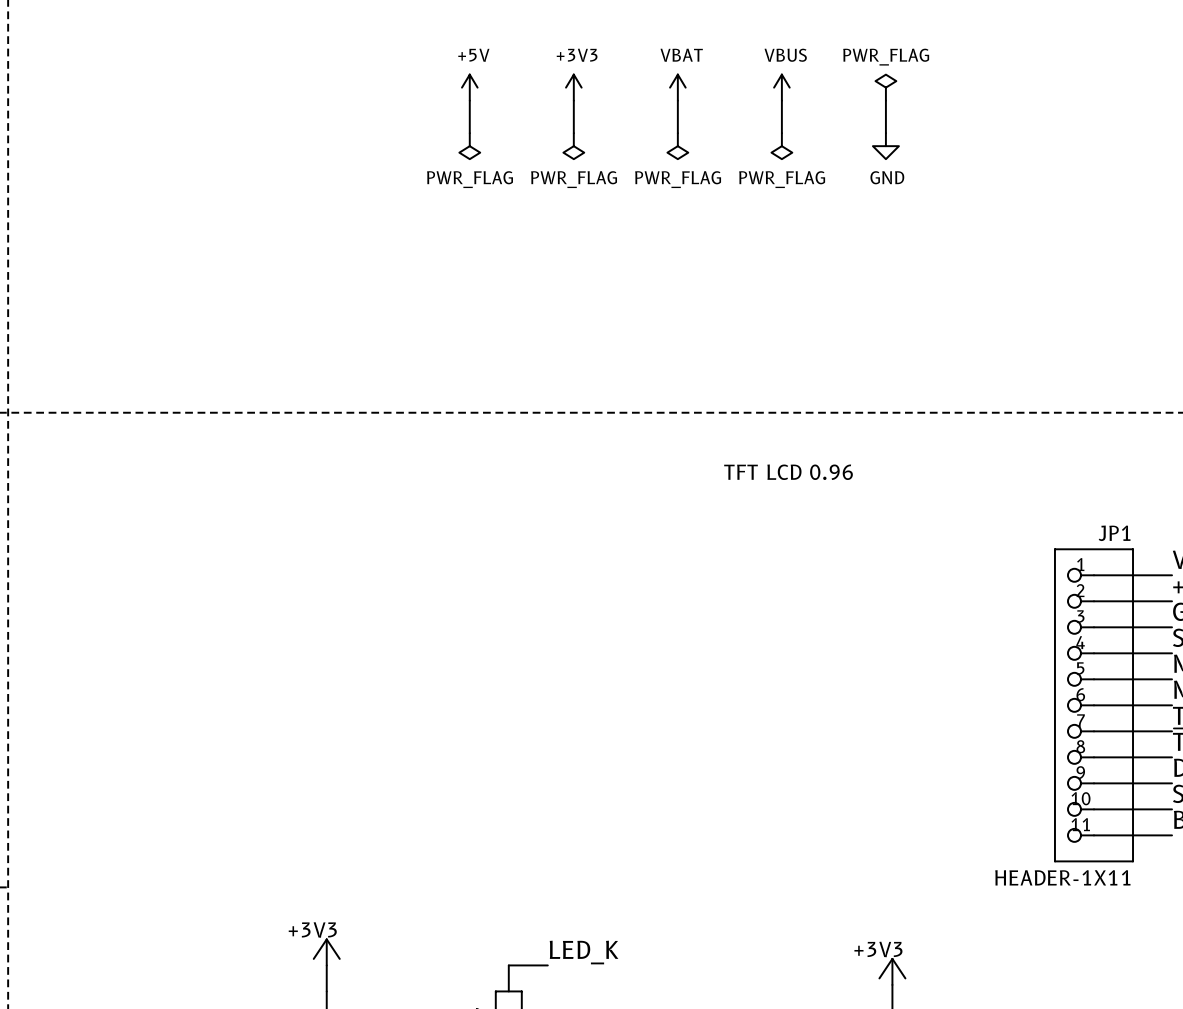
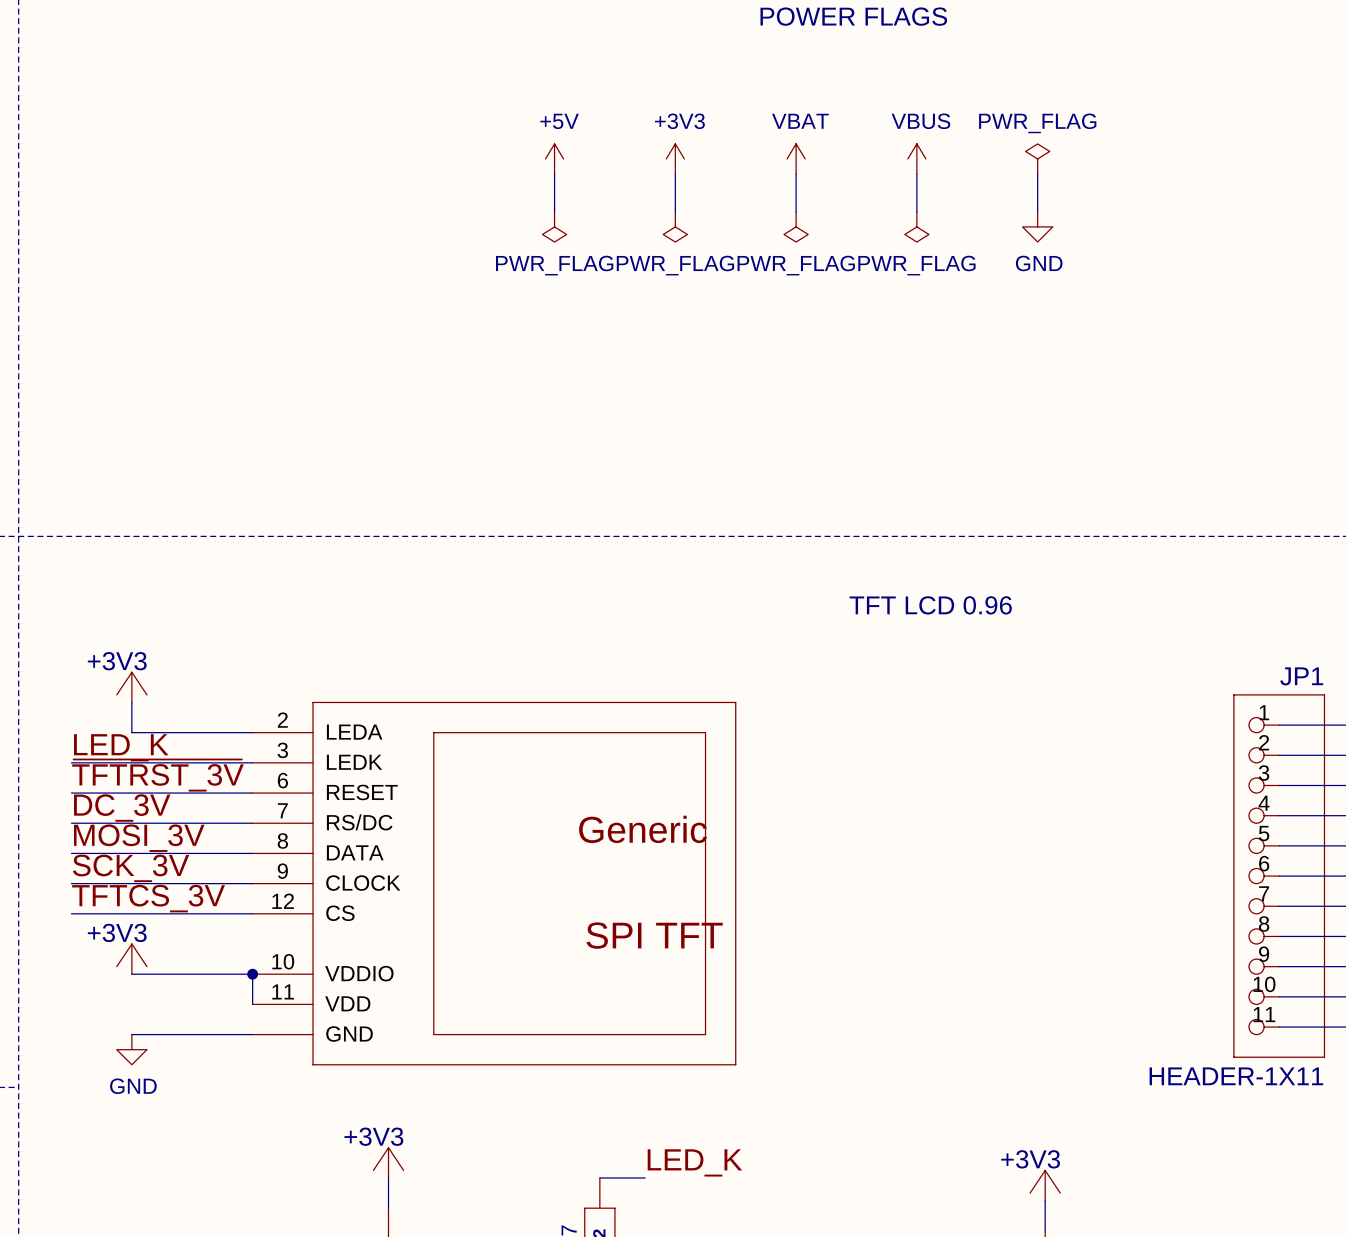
power symbol: none -> +3V3 (131, 687)
wire: none -> (131, 702) (131, 732) (252, 732)
label: none -> LED_K (121, 747)
wire: none -> (71, 762) (252, 762)
label: none -> ~{TFTRST_3V} (157, 775)
wire: none -> (71, 793) (252, 793)
label: none -> DC_3V (122, 807)
wire: none -> (71, 823) (252, 823)
label: none -> MOSI_3V (139, 838)
wire: none -> (71, 853) (252, 853)
label: none -> SCK_3V (131, 868)
wire: none -> (71, 883) (252, 883)
part: none -> (494, 883)
label: none -> TFTCS_3V (148, 898)
wire: none -> (71, 913) (252, 913)
power symbol: none -> +3V3 (131, 959)
wire: none -> (131, 974) (252, 974) (252, 1004)
junction: none -> (252, 974)
wire: none -> (131, 1034) (252, 1034)
power symbol: none -> GND (131, 1049)

